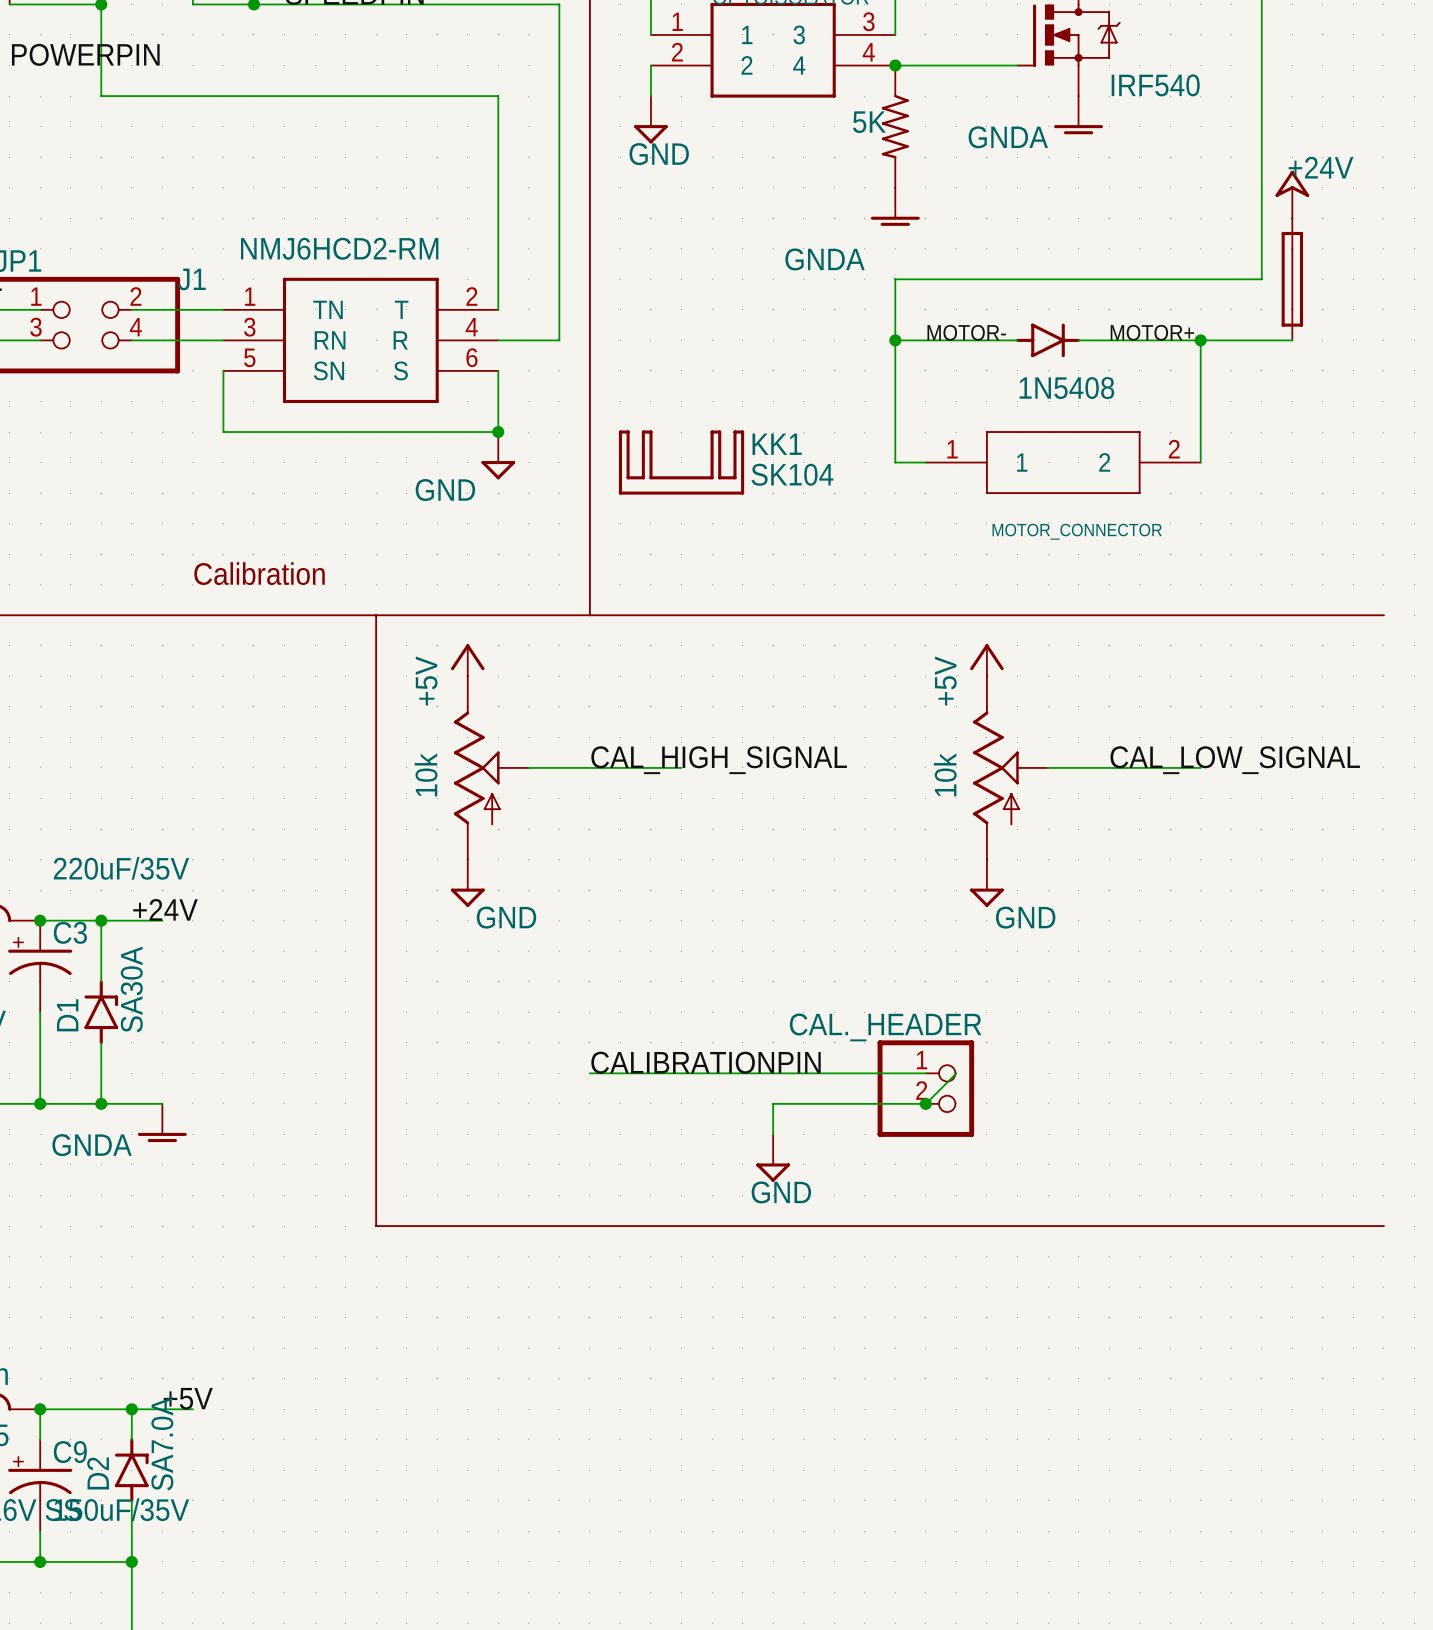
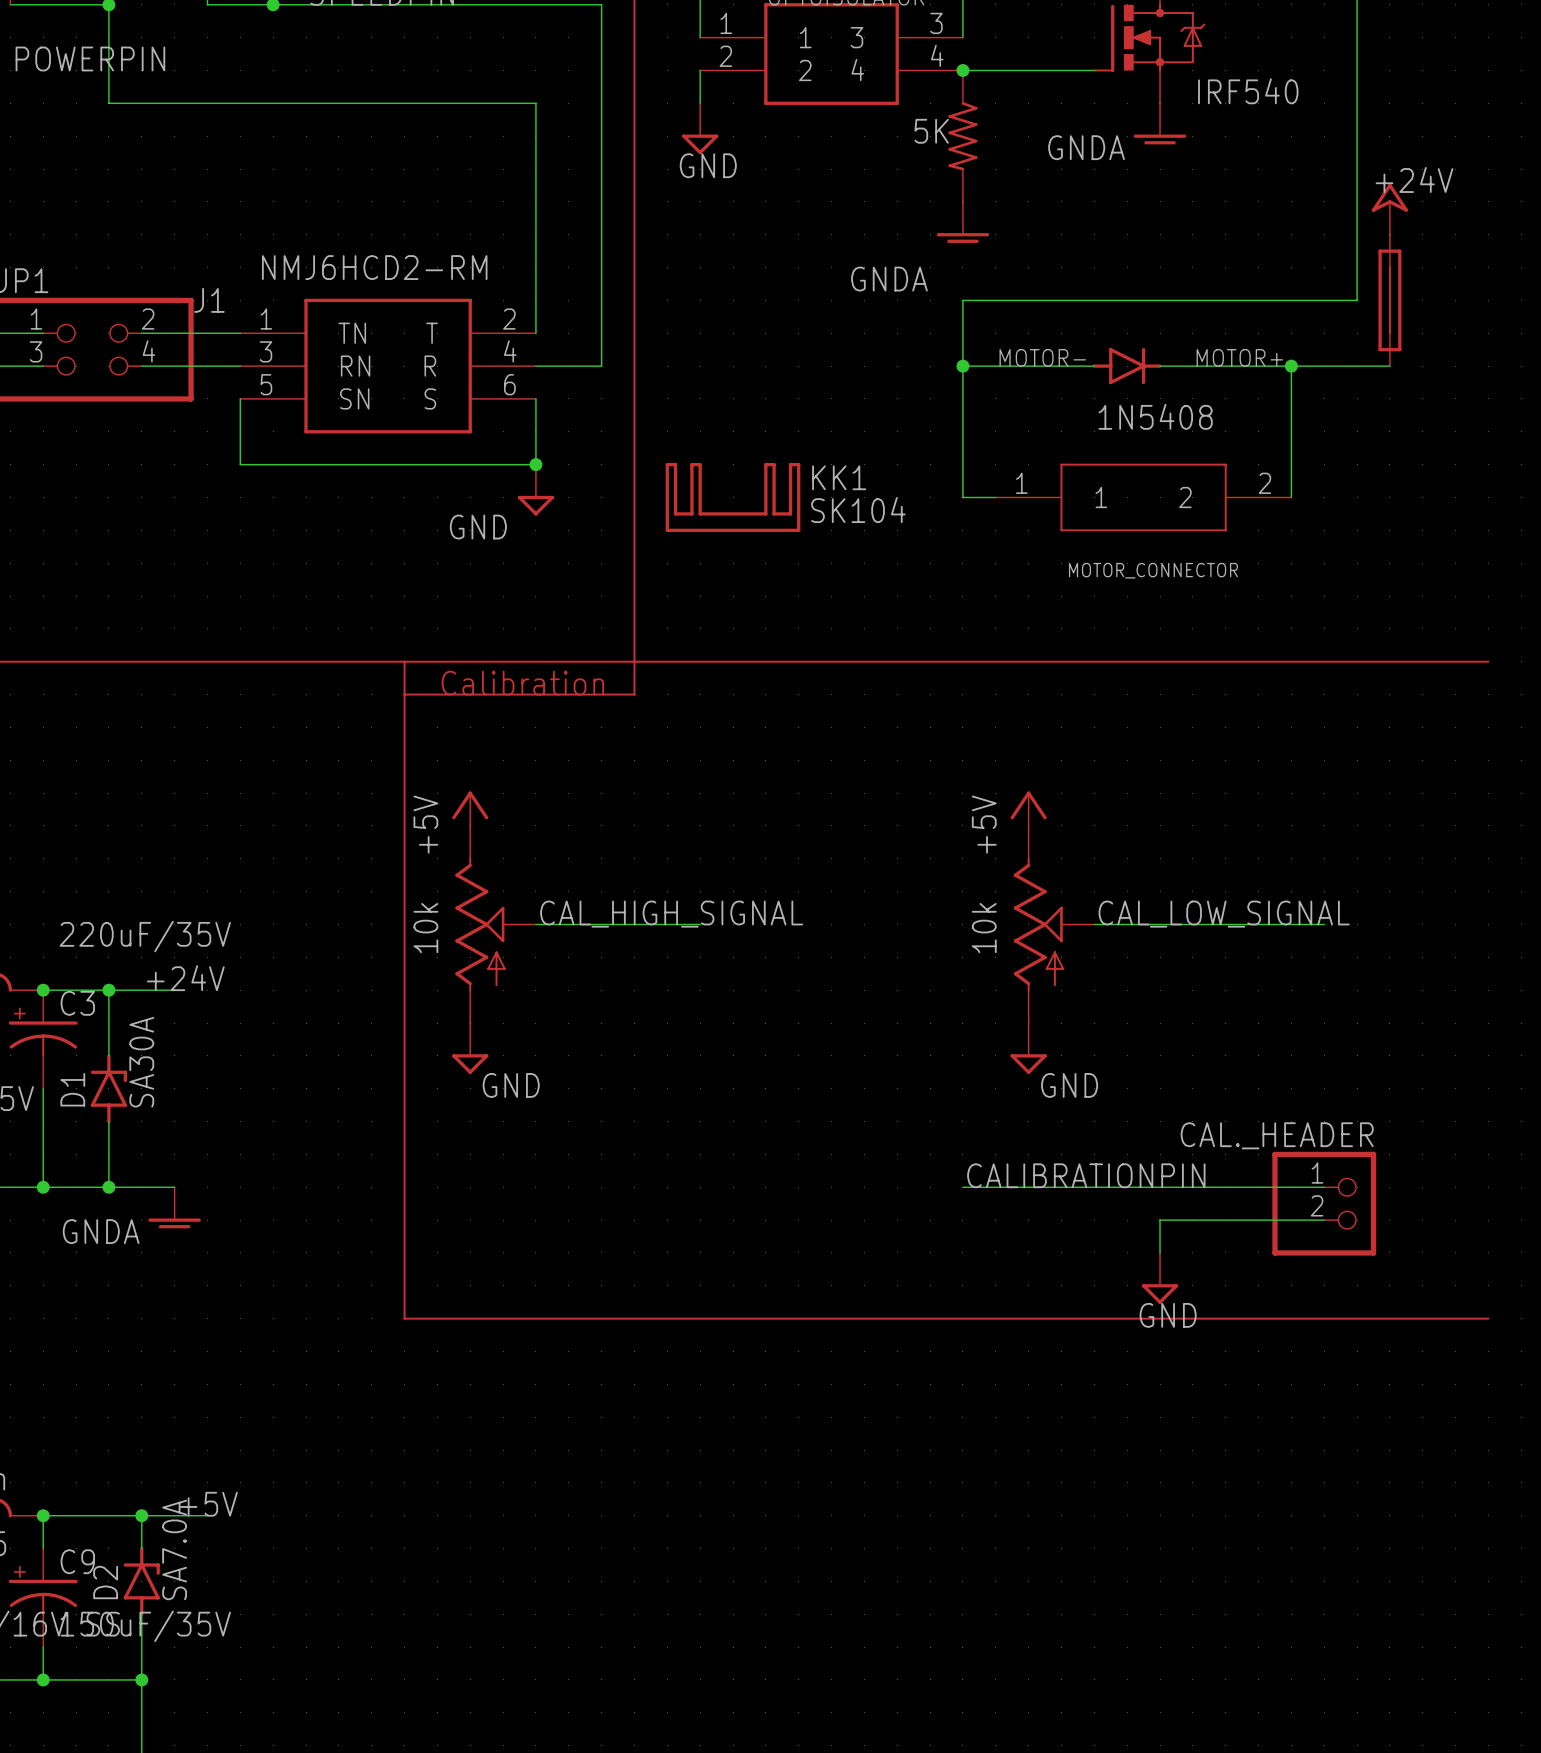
text position: Calibration (259, 573) -> Calibration (522, 683)
line: none -> (634, 661) (634, 694) (404, 694)
power symbol position: +5V (467, 660) -> +5V (470, 808)
power symbol position: +5V (986, 660) -> +5V (1028, 808)
label position: CAL_HIGH_SIGNAL (719, 760) -> CAL_HIGH_SIGNAL (671, 914)
label position: CAL_LOW_SIGNAL (1235, 760) -> CAL_LOW_SIGNAL (1224, 914)
part position: (491, 767) -> (495, 924)
wire: (528, 767) (681, 767) -> (535, 924) (700, 924)
part position: (1010, 767) -> (1054, 924)
wire: (1048, 767) (1200, 767) -> none
wire: none -> (1094, 924) (1324, 924)
power symbol position: GND (467, 883) -> GND (470, 1048)
power symbol position: GND (986, 883) -> GND (1028, 1048)
label: CALIBRATIONPIN (706, 1062) -> none
wire: (589, 1073) (925, 1073) -> none
wire: (956, 1073) (925, 1103) -> (1324, 1187) (995, 1187)
CAL._HEADER: (925, 1088) -> none
label: none -> CALIBRATIONPIN (1086, 1175)
wire: (895, 1103) (773, 1103) (773, 1134) -> none
junction: (925, 1103) -> none
CAL._HEADER: none -> (1324, 1203)
wire: none -> (1324, 1220) (1160, 1220) (1160, 1252)
power symbol: GND (773, 1158) -> none
power symbol: none -> GND (1160, 1278)

